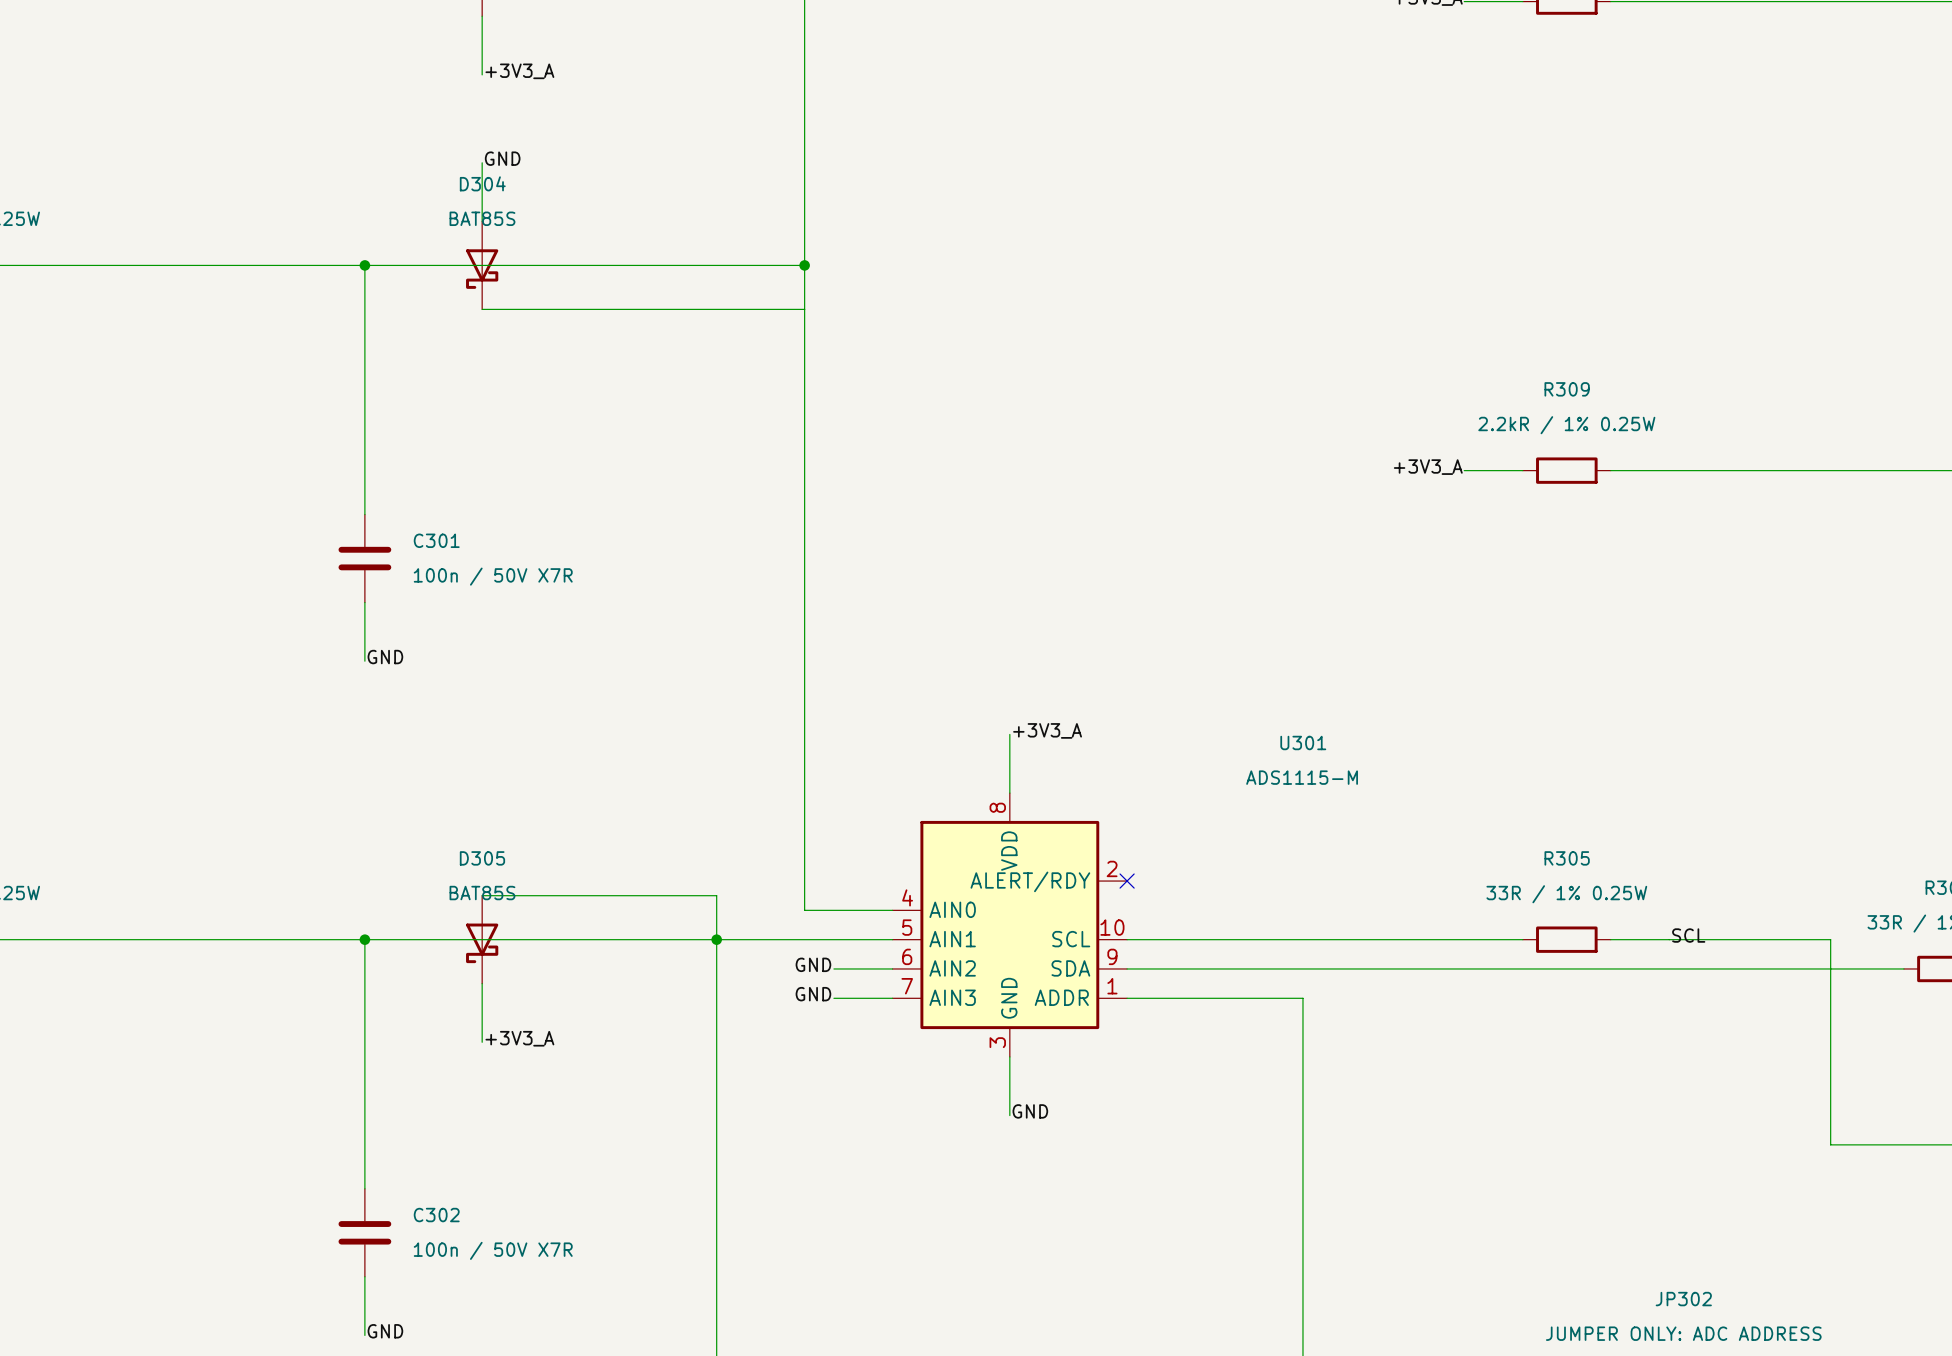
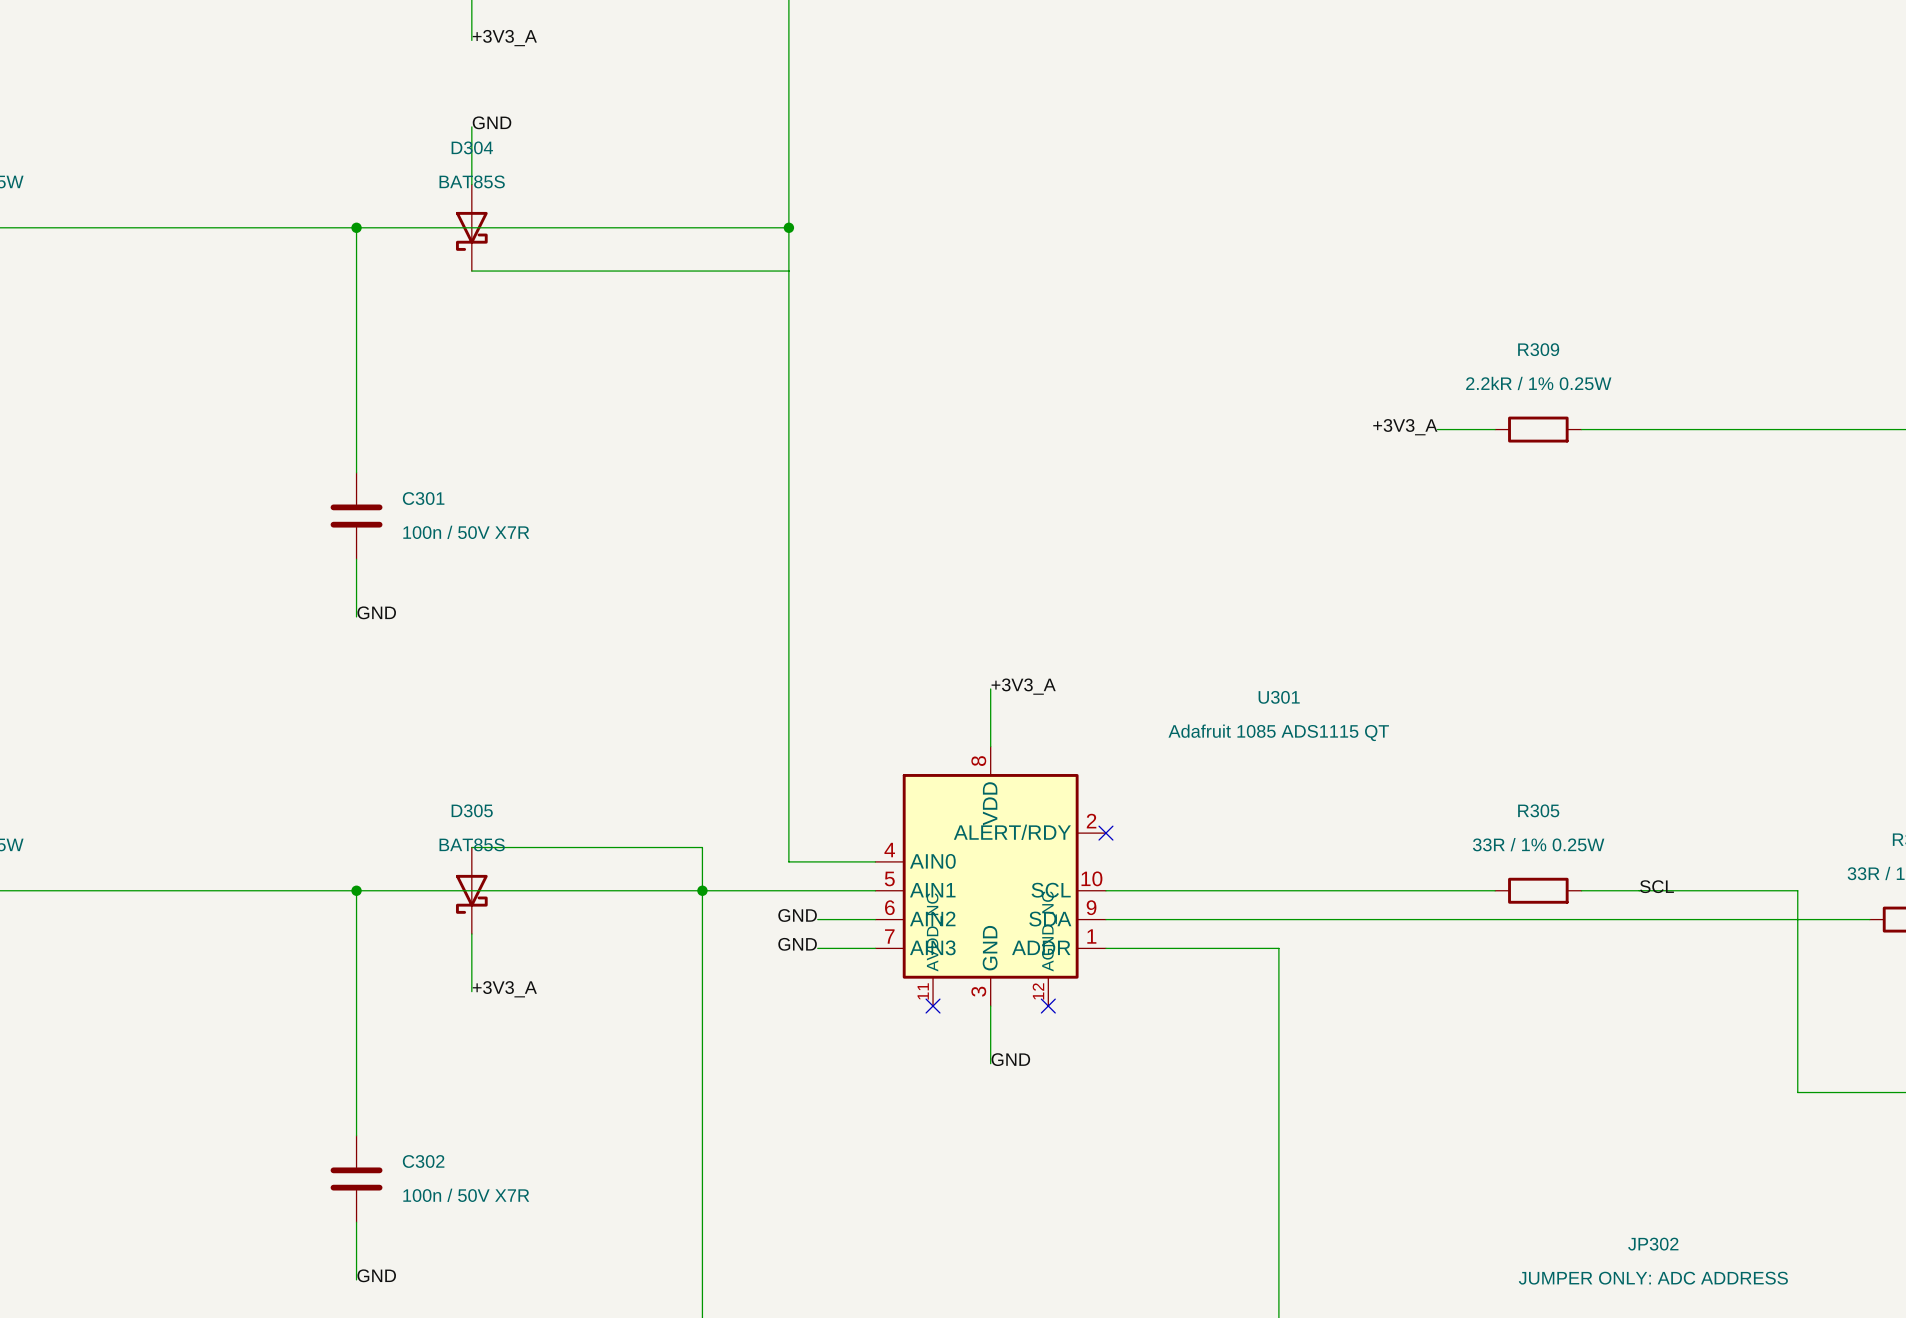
U301 value: ADS1115-M (1302, 777) -> Adafruit 1085 ADS1115 QT (1278, 732)
U301 symbol: [892, 793, 1128, 1057] -> [875, 746, 1106, 1007]
no-connect mark: none -> (933, 1006)
no-connect mark: none -> (1048, 1006)

